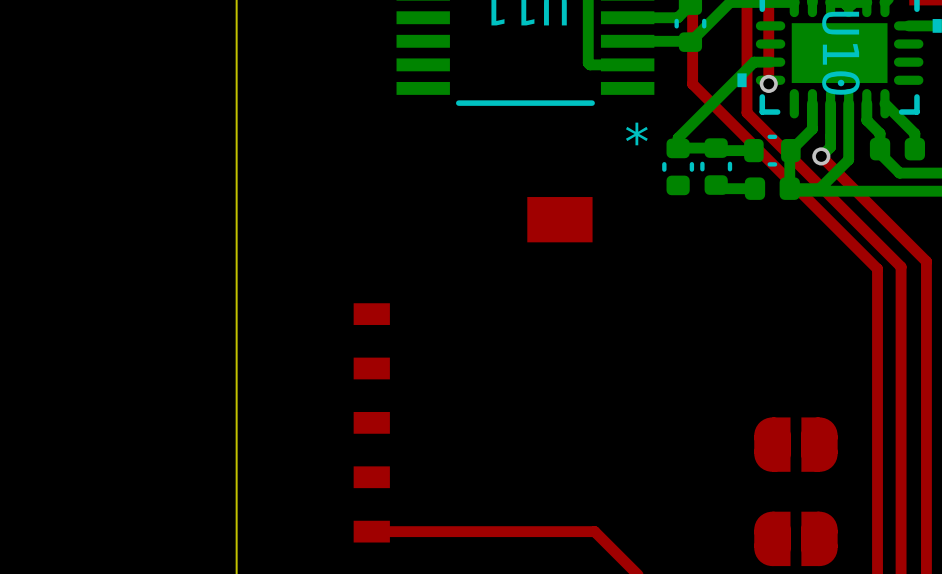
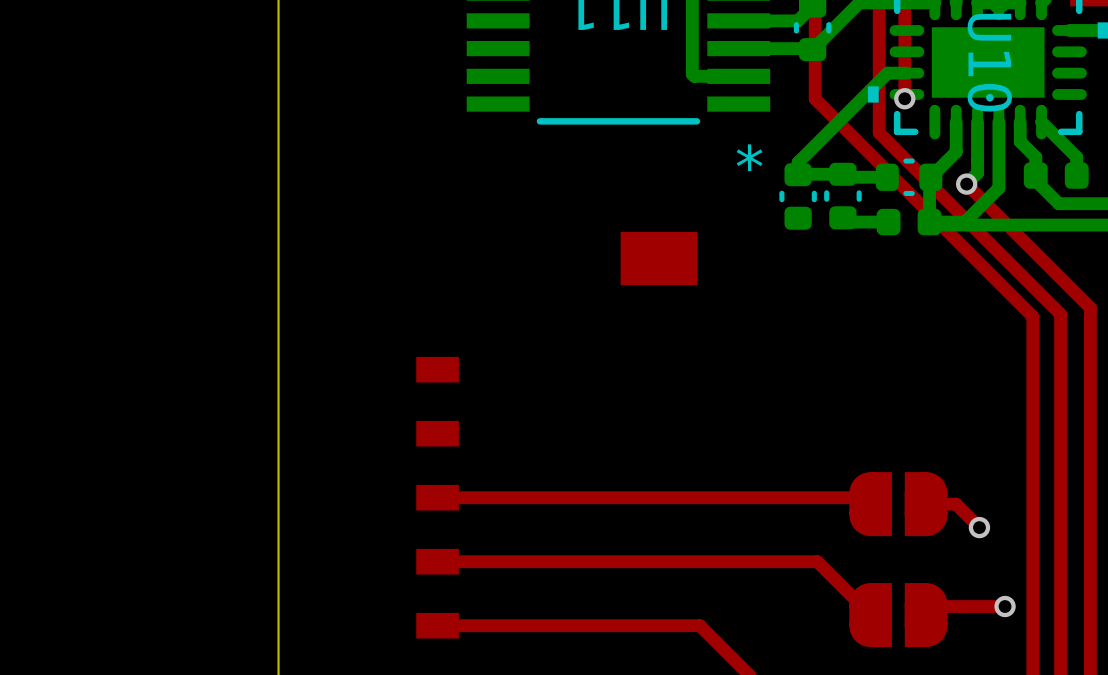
top track: none -> (437, 497) (864, 497) (870, 504)
top track: none -> (926, 504) (955, 504) (979, 527)
part position: (795, 444) -> (898, 504)
via: none -> (979, 527)
top track: none -> (437, 561) (817, 561) (870, 615)
top track: none -> (1005, 606) (934, 606) (926, 615)
via: none -> (1005, 606)
part position: (795, 538) -> (898, 615)

